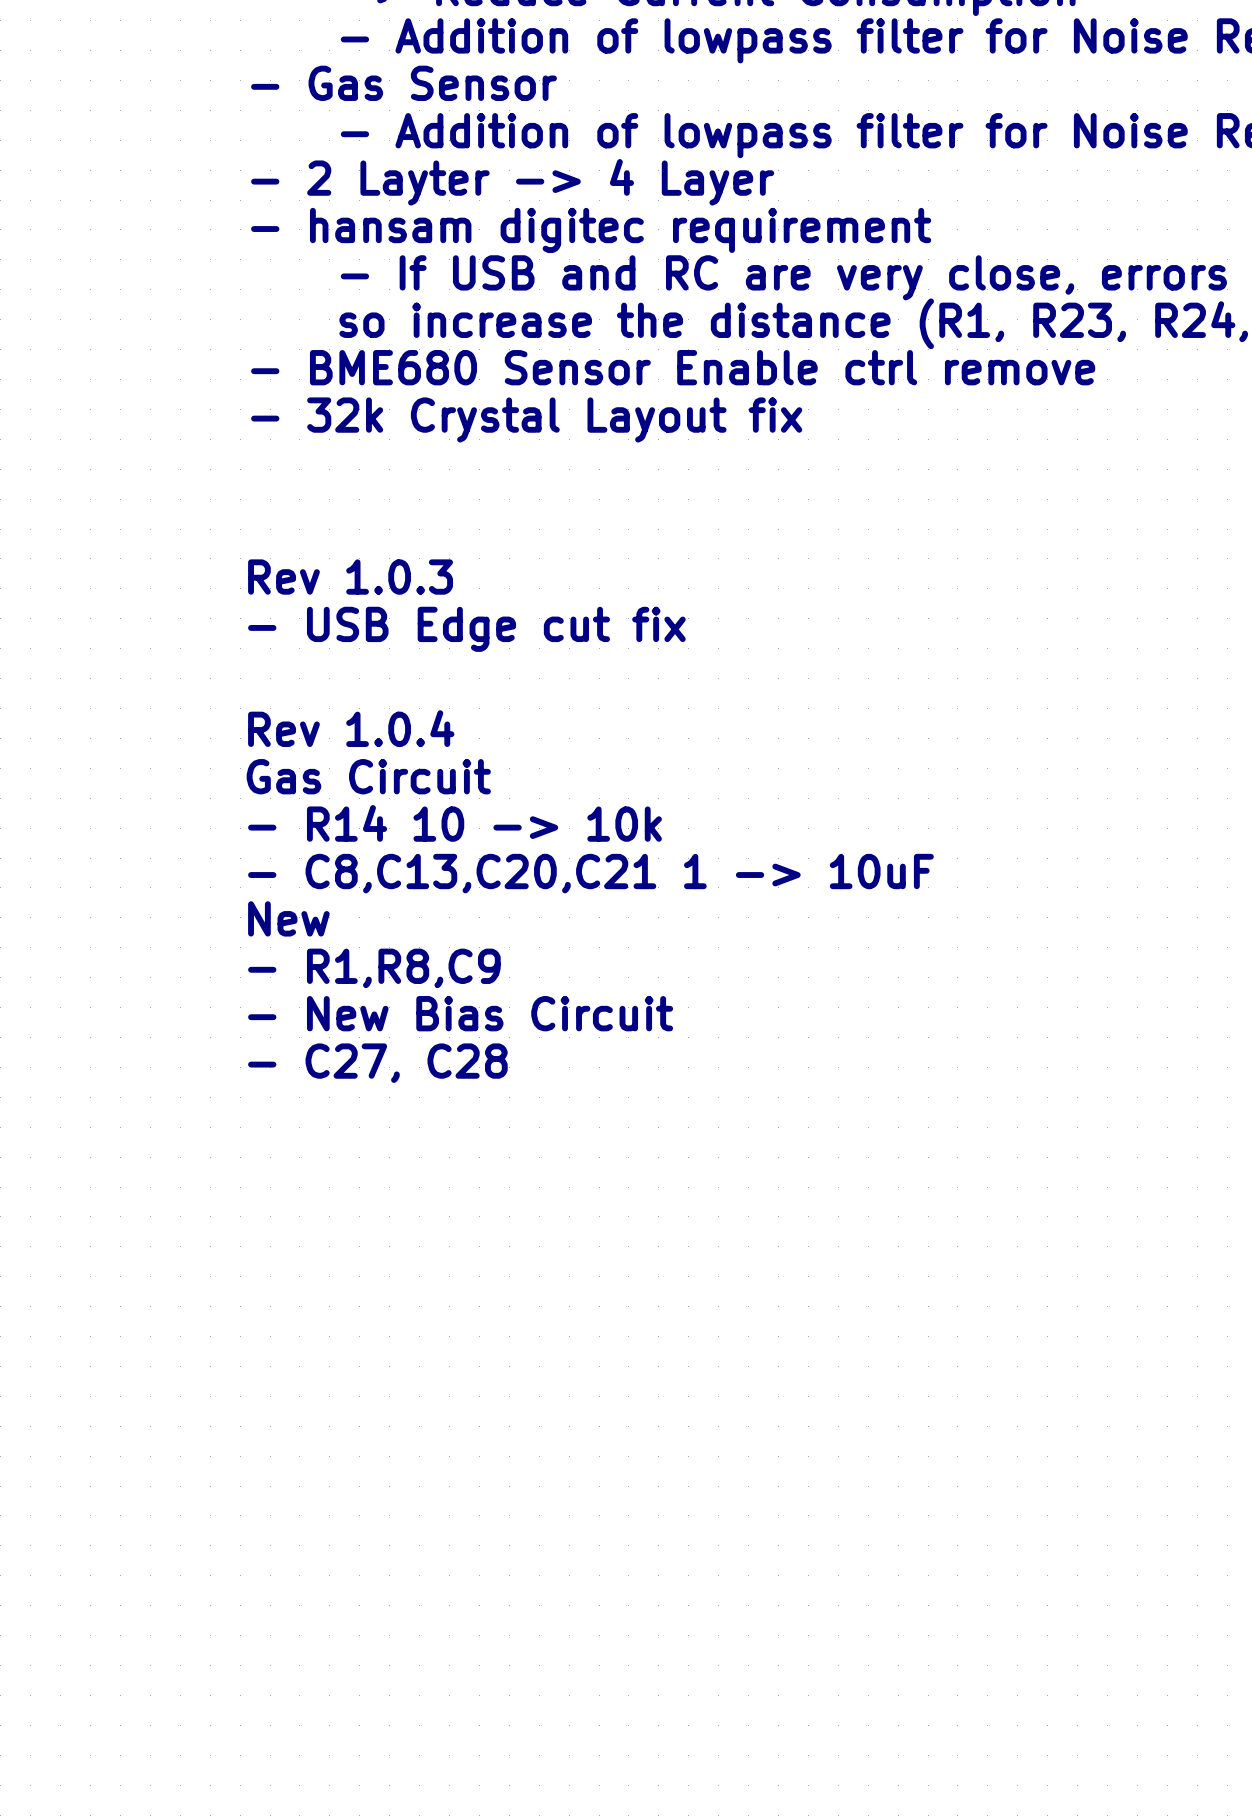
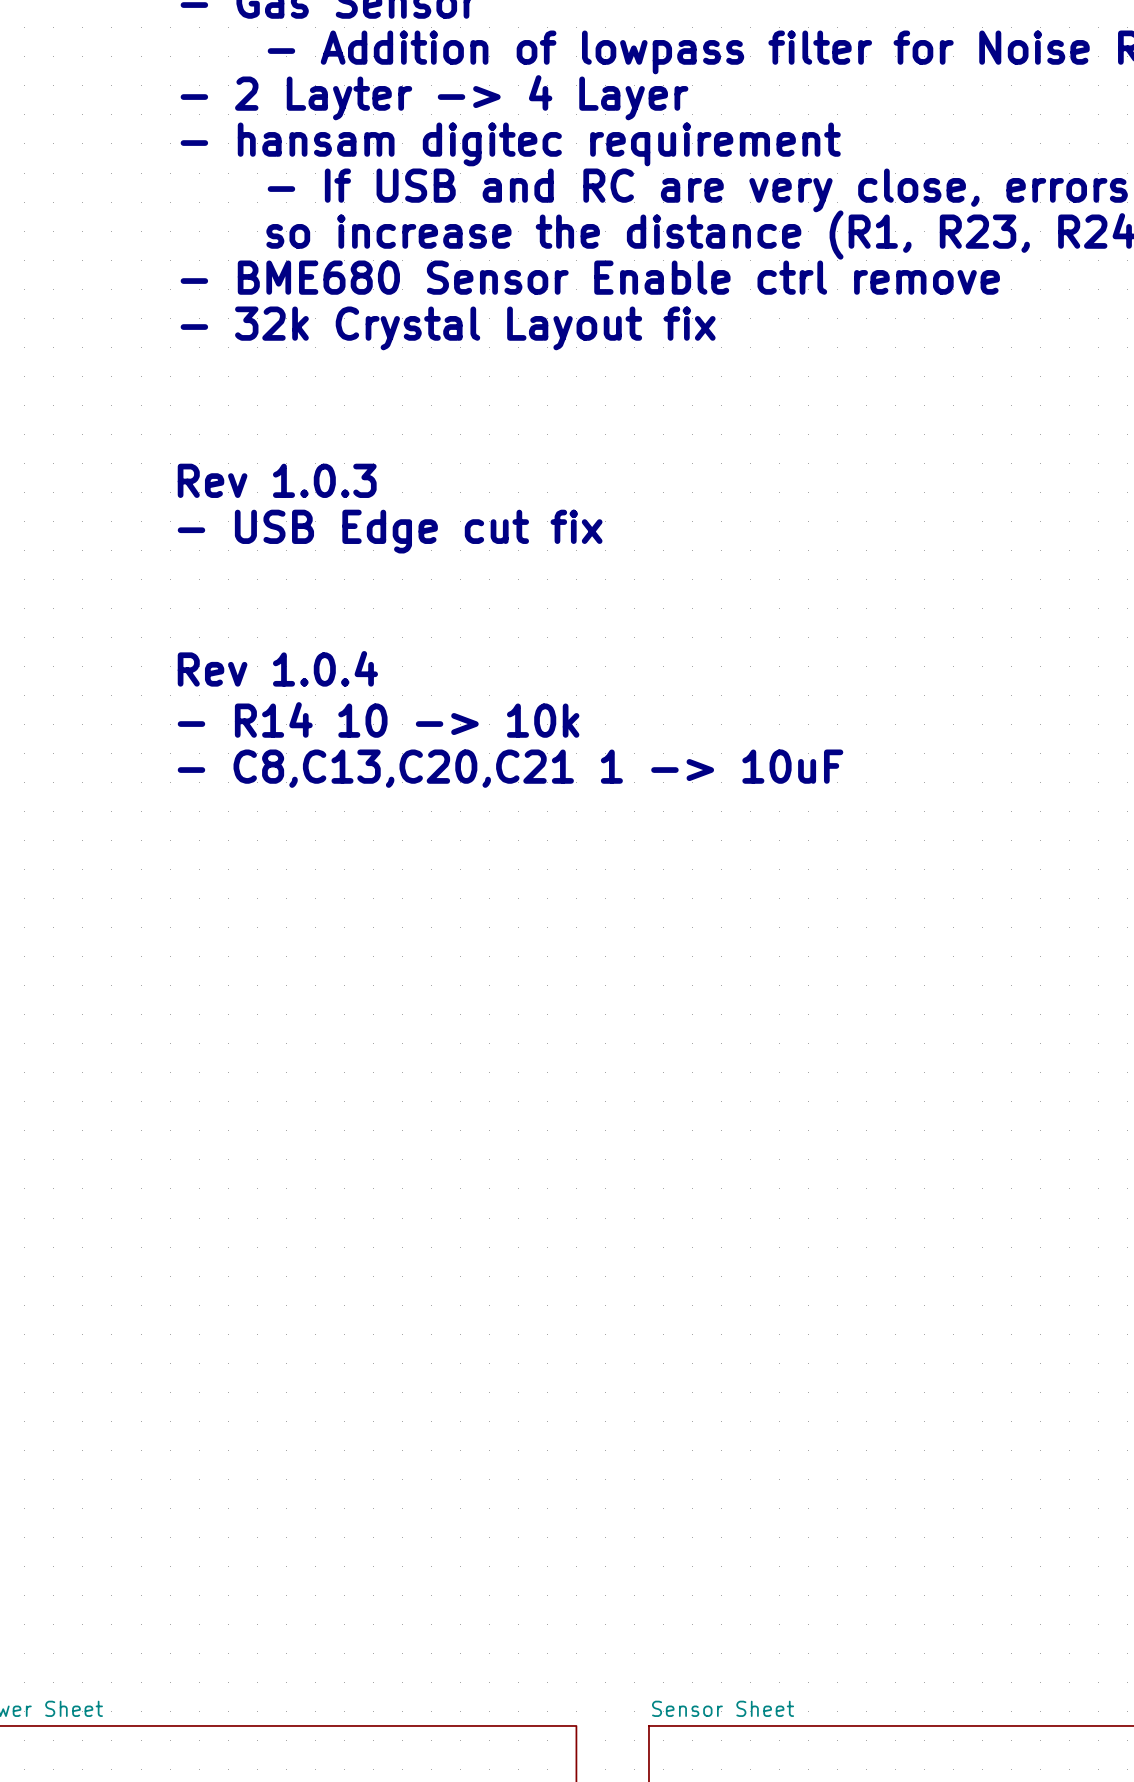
text position: Rev 1.0.4 (351, 728) -> Rev 1.0.4 (277, 668)
text: Gas Circuit (368, 776) -> none
text: New (288, 918) -> none
text: - R1,R8,C9 (374, 968) -> none
text: - New Bias Circuit (460, 1013) -> none
text: - C27, C28 (377, 1063) -> none

